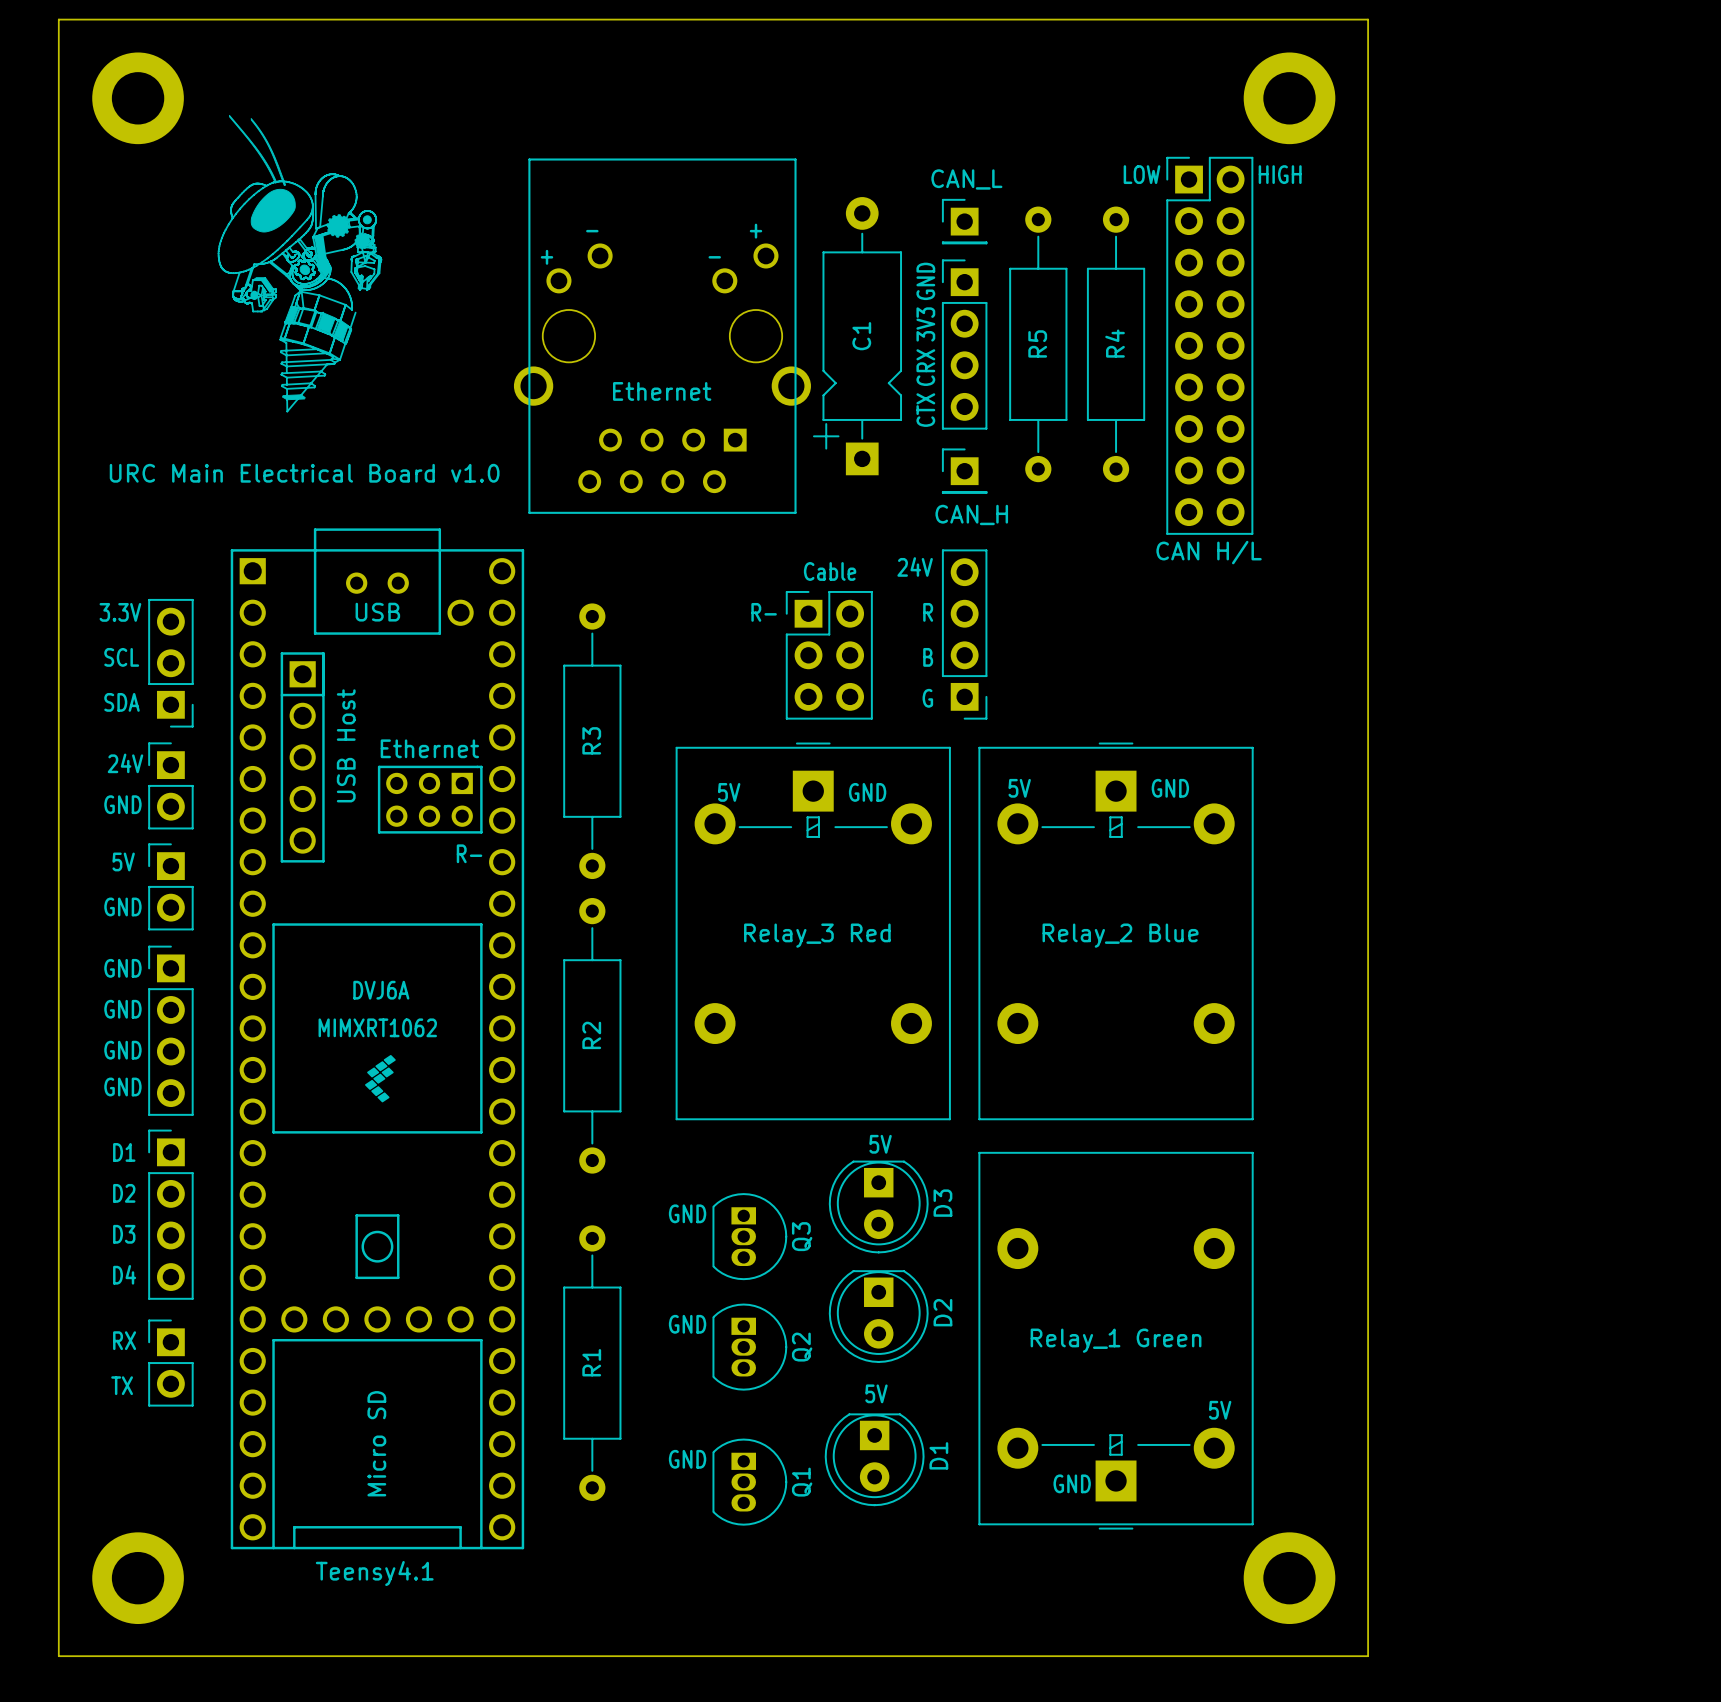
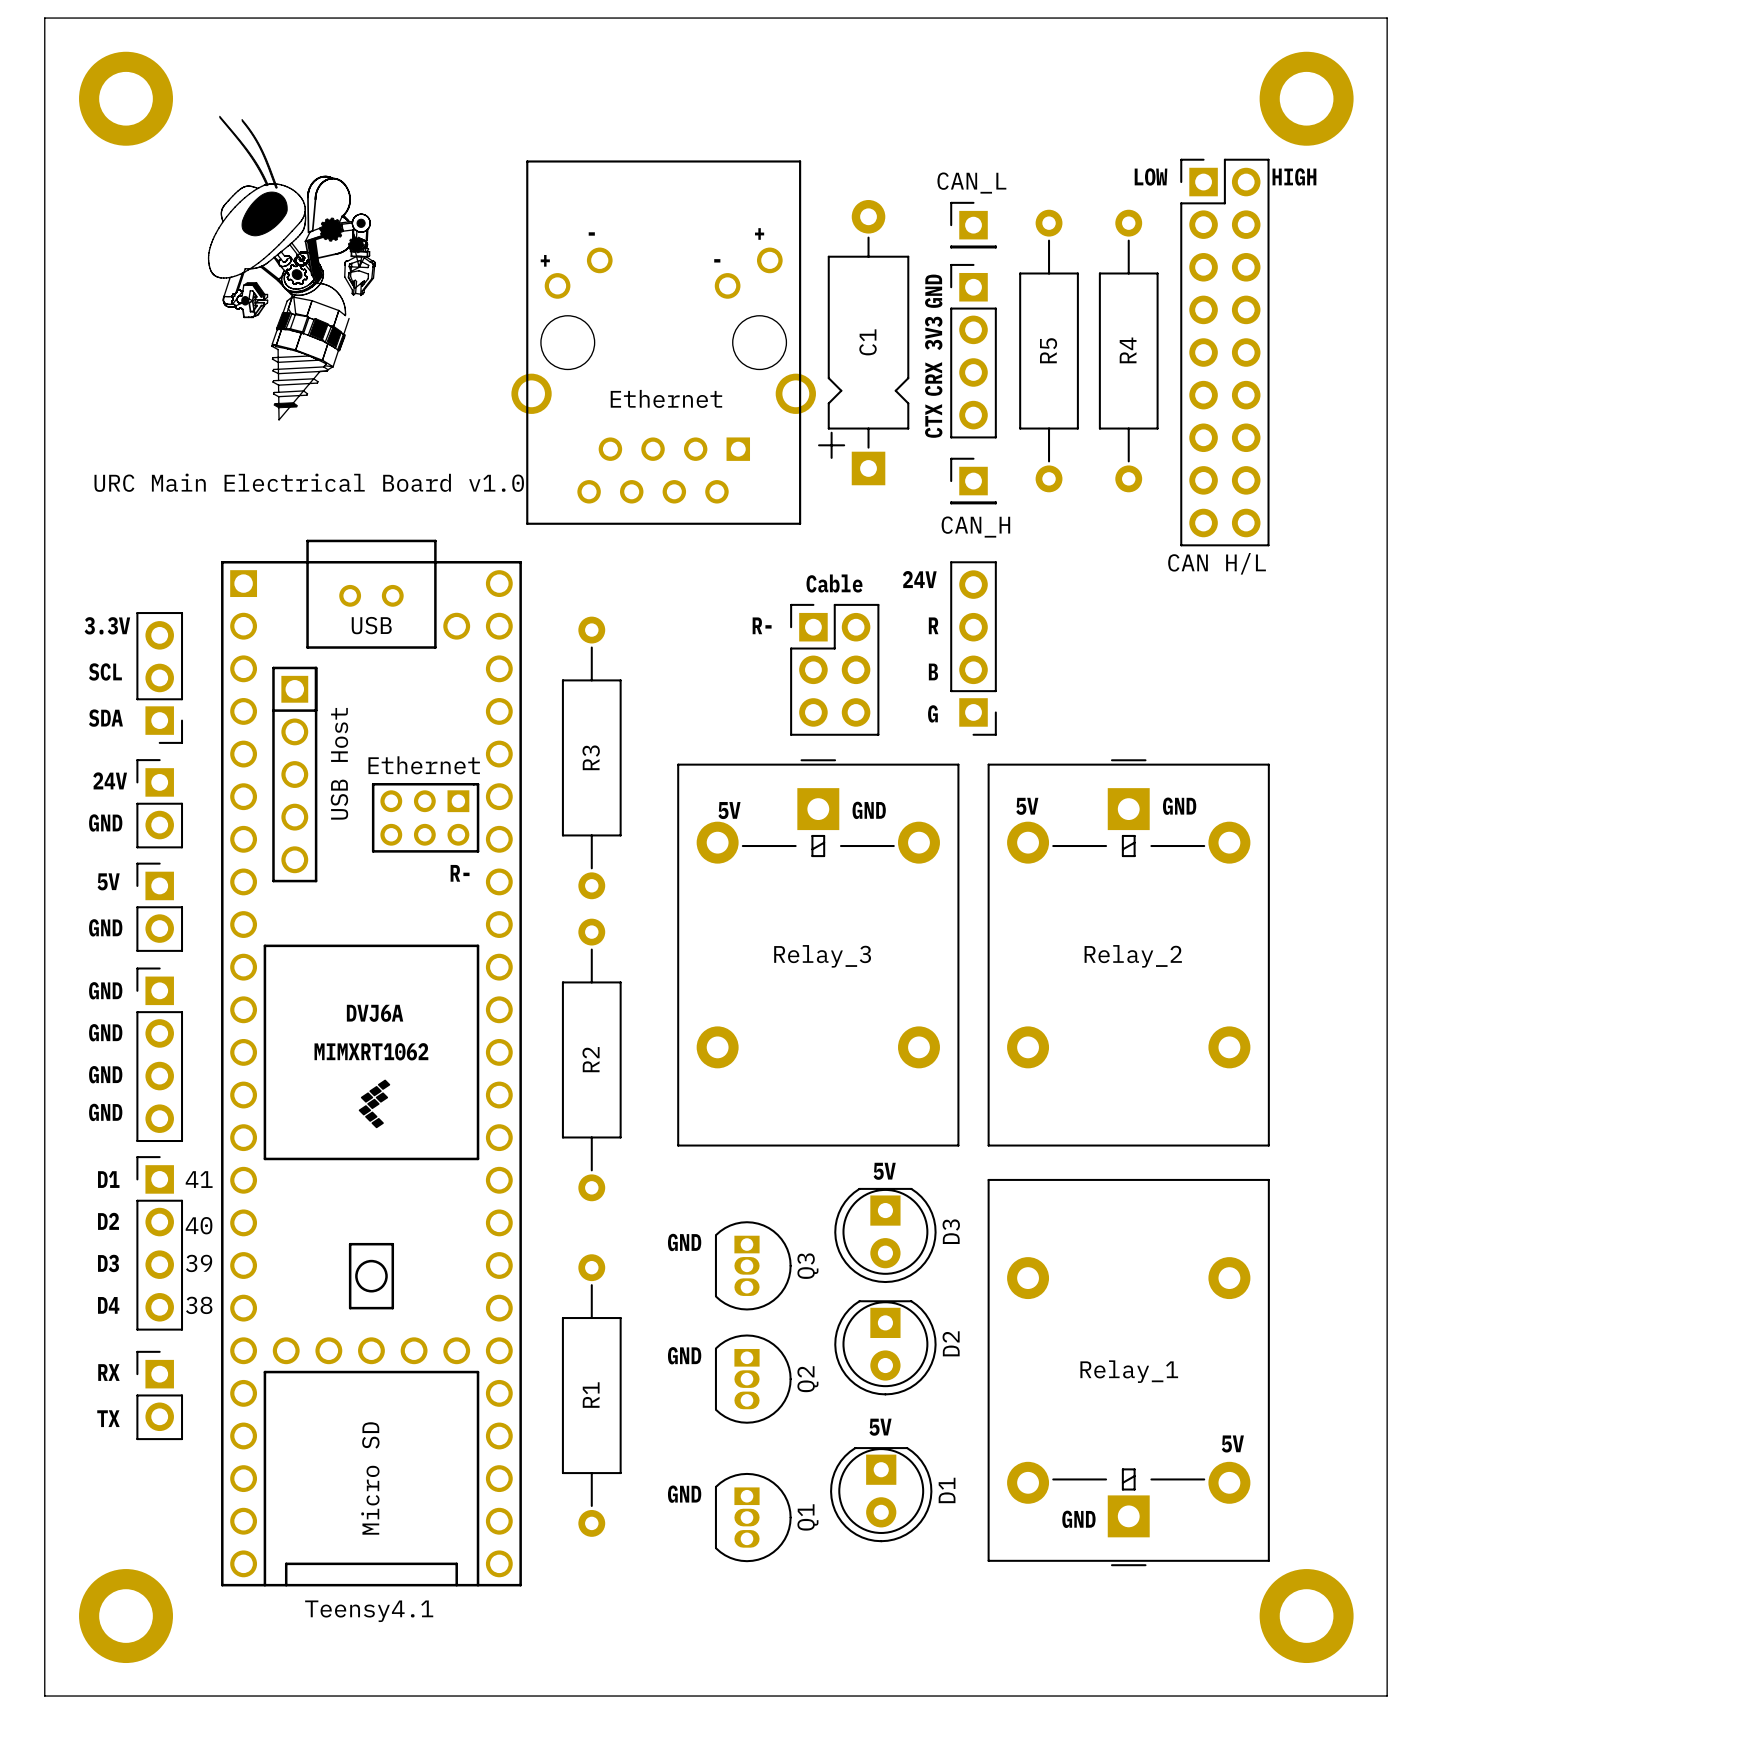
Relay_3 Red name: Relay_3 Red (817, 935) -> Relay_3 (822, 956)
Relay_2 Blue name: Relay_2 Blue (1120, 935) -> Relay_2 (1133, 956)
text: none -> 41 (199, 1179)
text: none -> 40 (199, 1225)
text: none -> 39 (199, 1263)
text: none -> 38 (199, 1305)
Relay_1 Green name: Relay_1 Green (1116, 1340) -> Relay_1 (1129, 1371)

